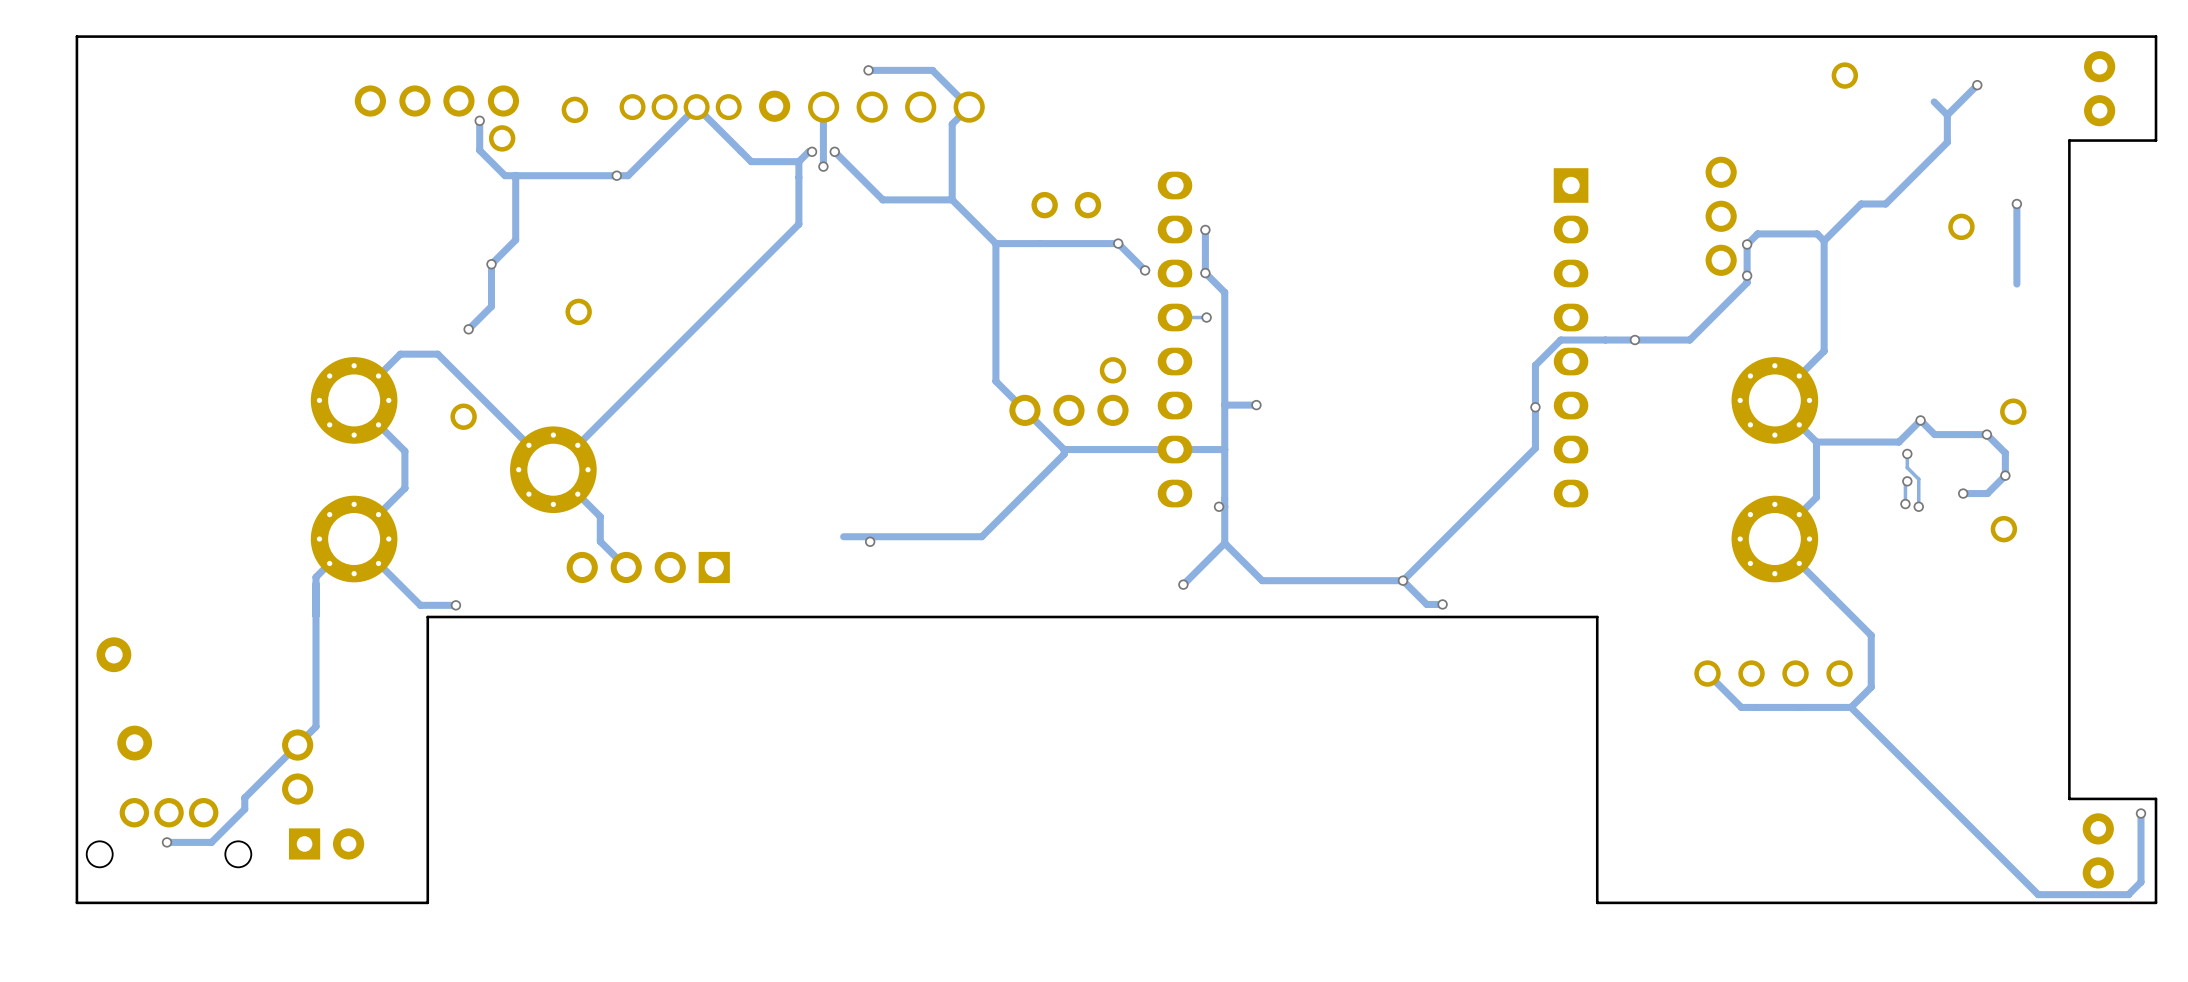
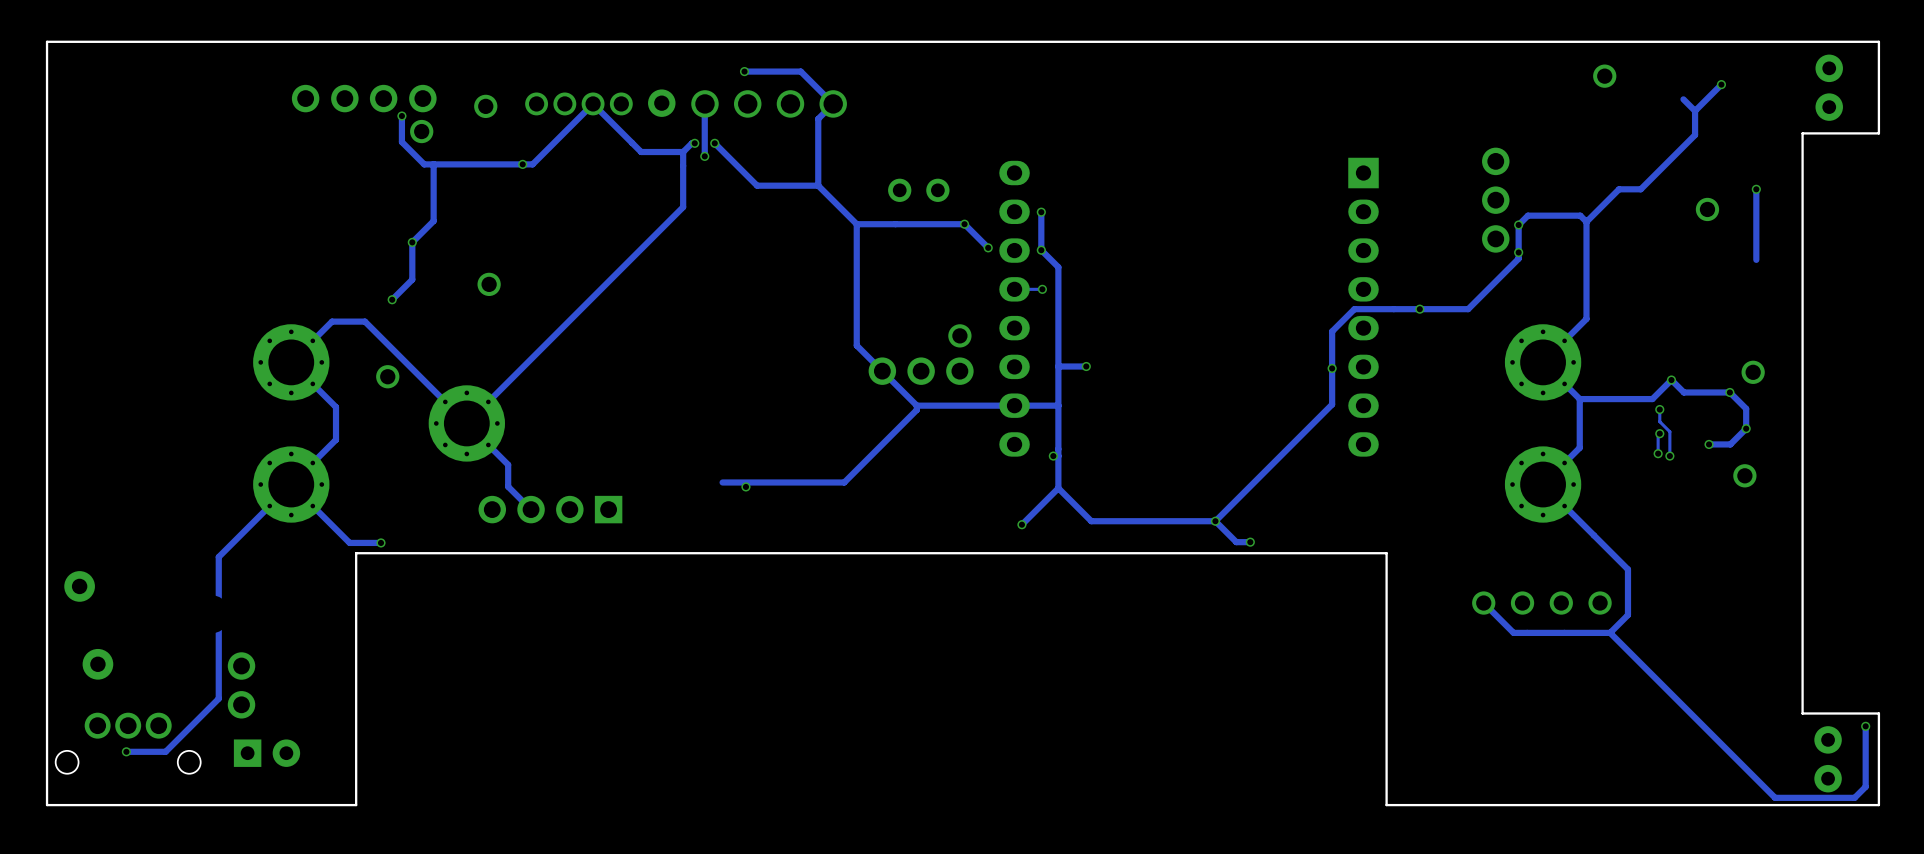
track: (316, 577) (316, 726) (244, 797) (244, 809) -> (257, 518) (218, 557) (218, 698) (194, 722)

